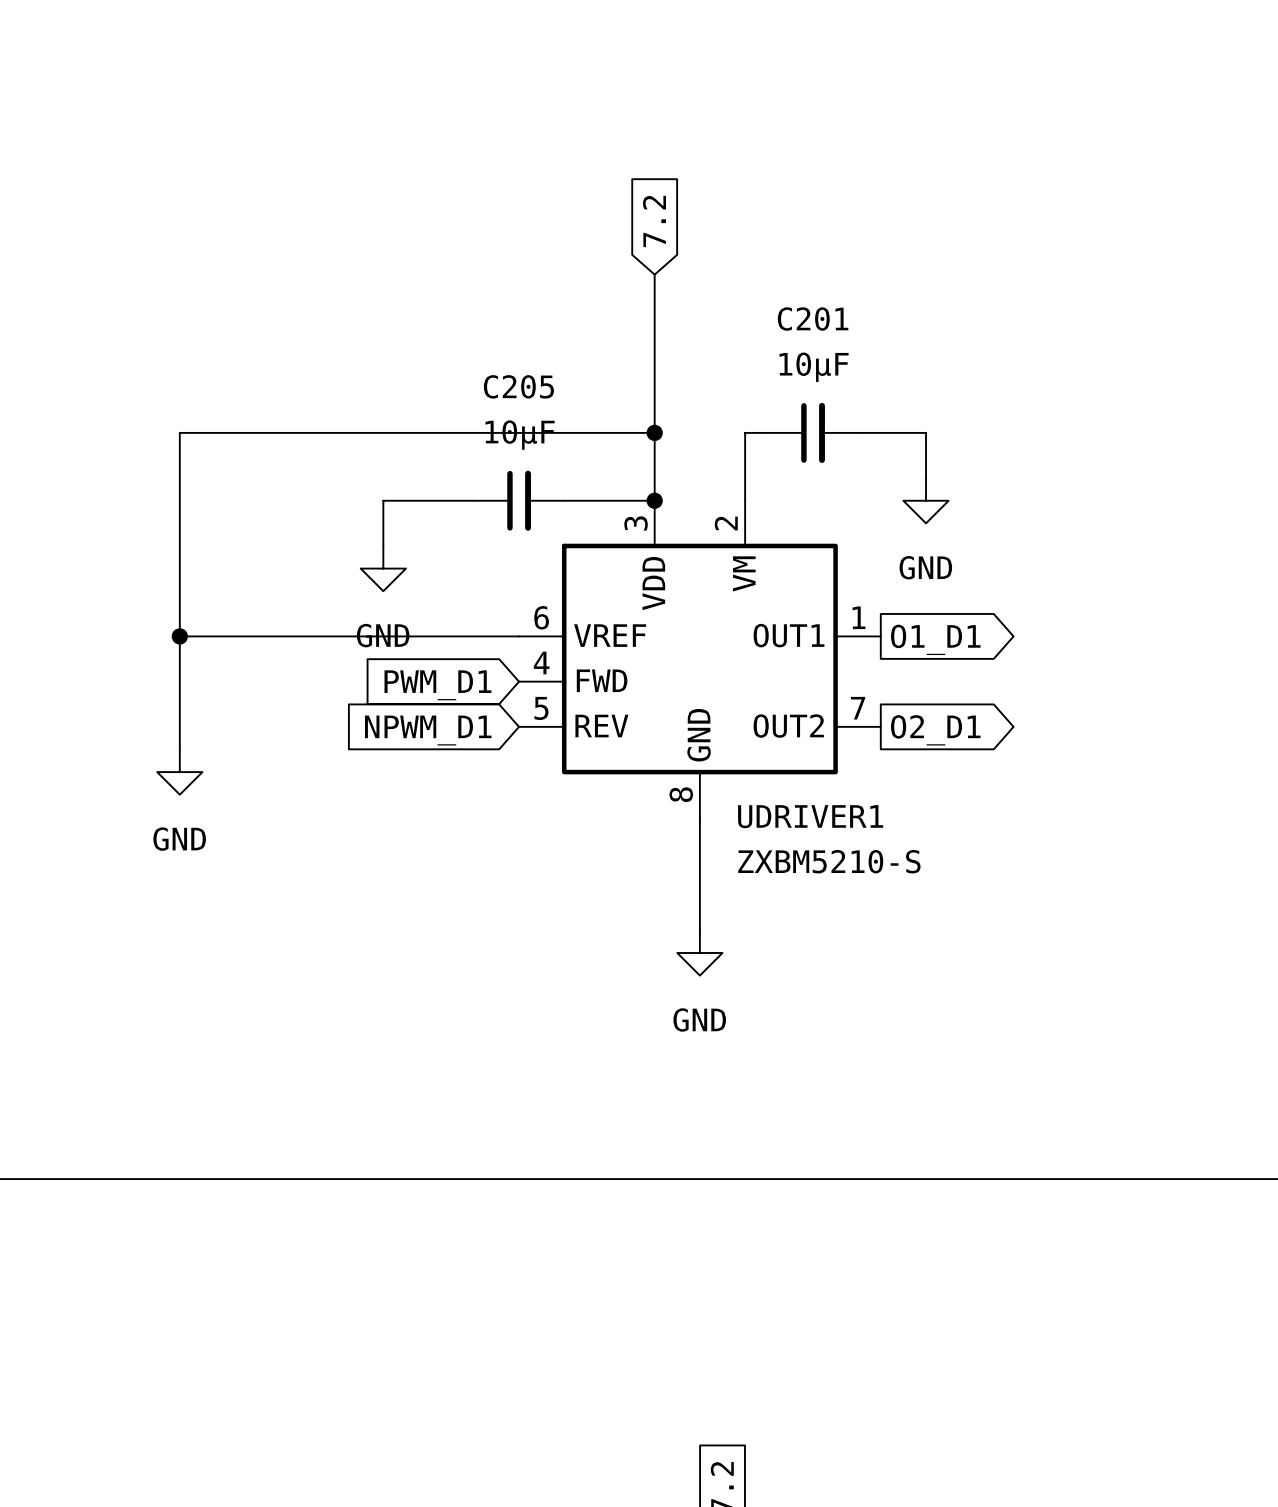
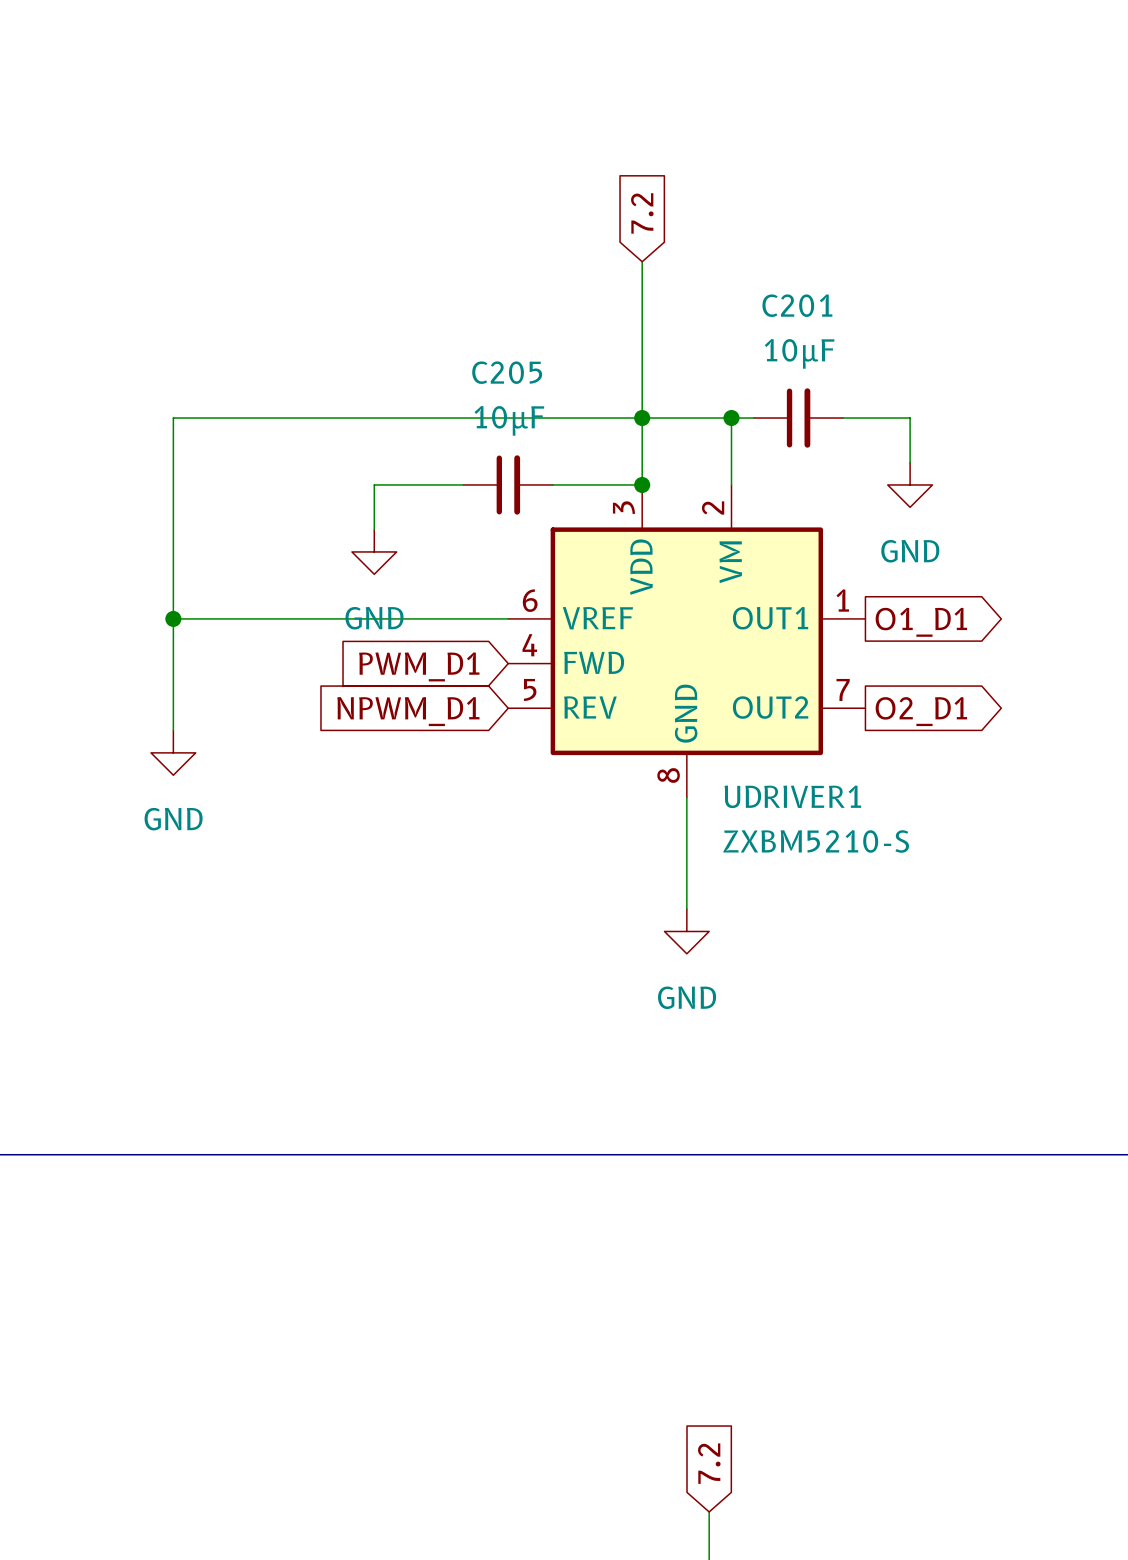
wire: none -> (642, 418) (731, 418)
junction: none -> (731, 418)

